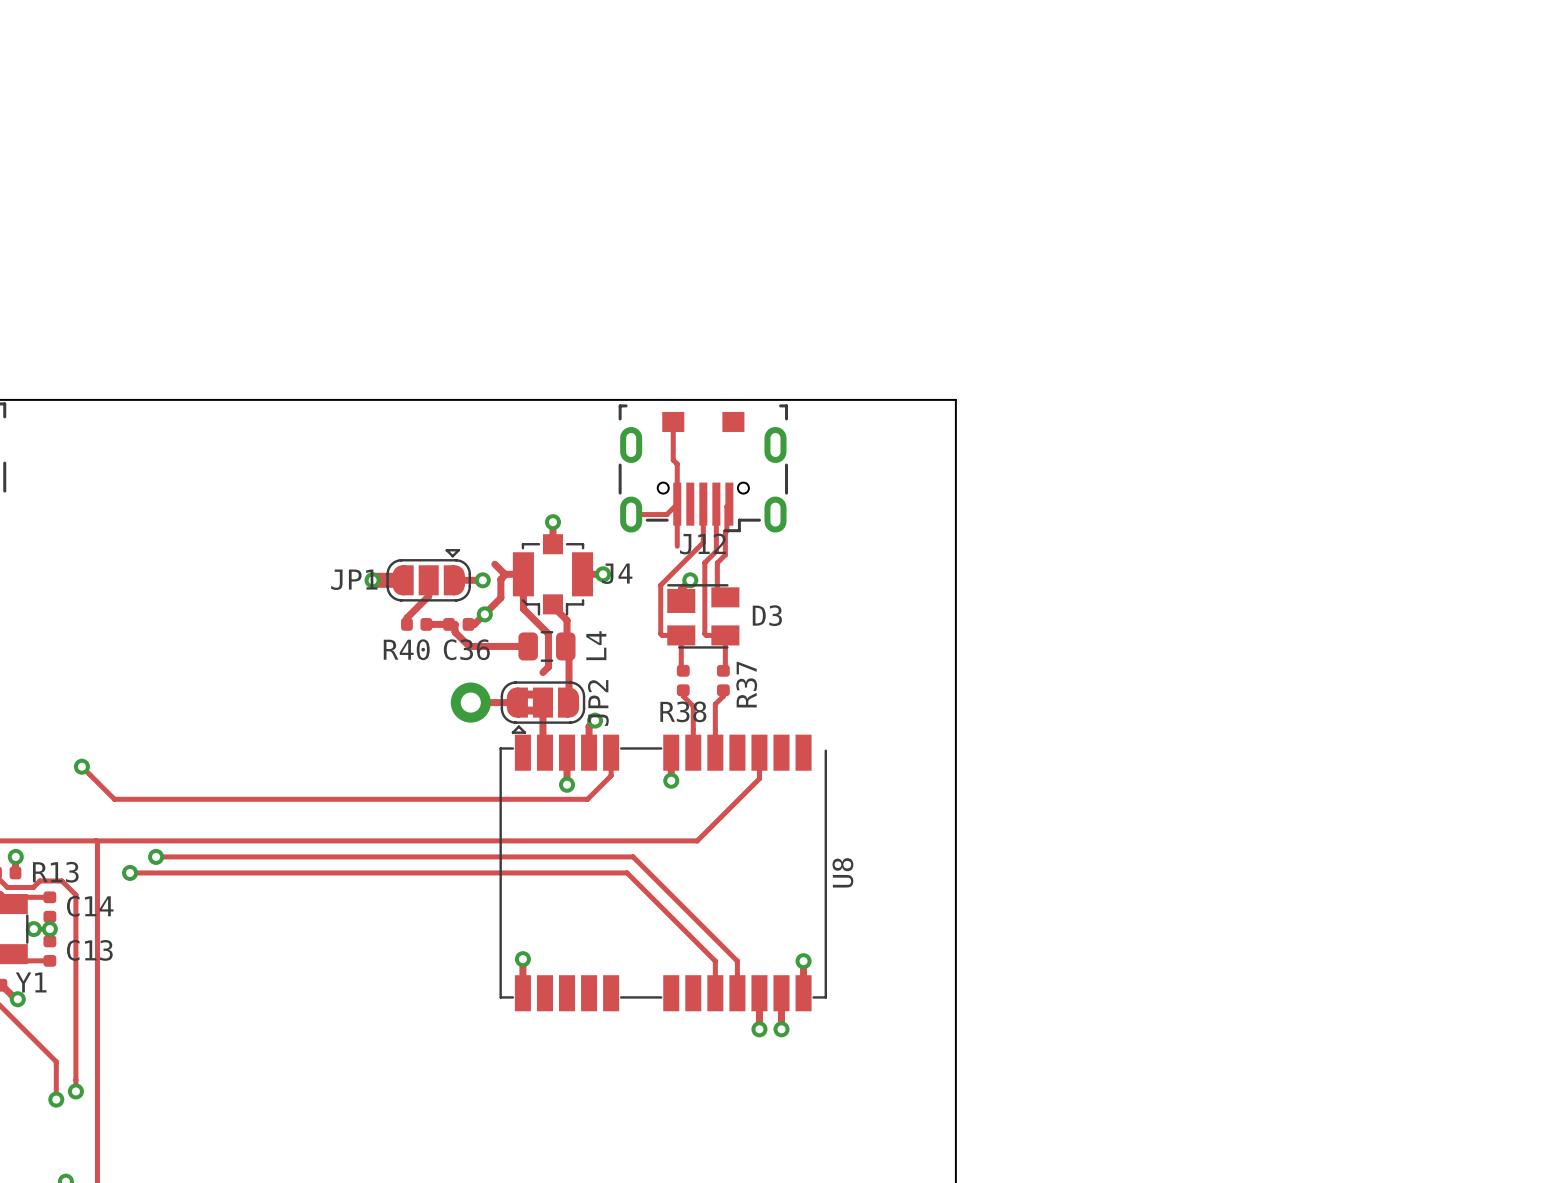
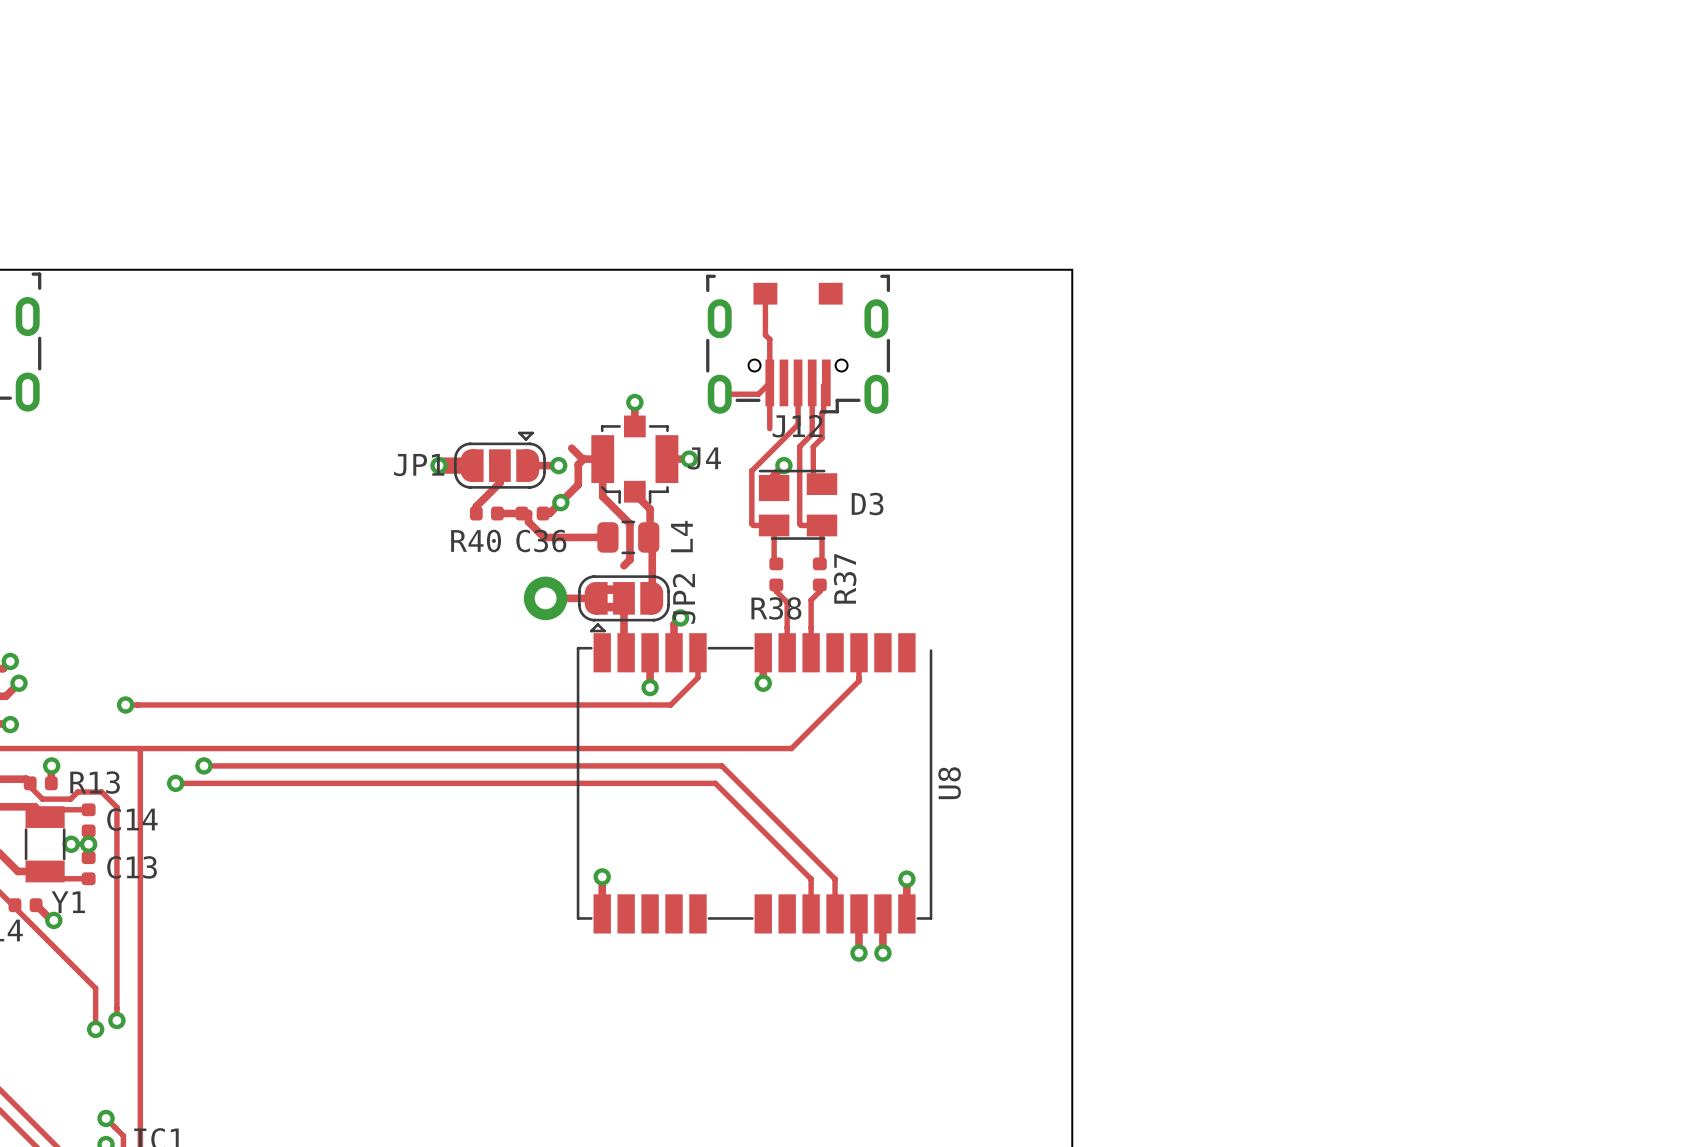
track: (81, 766) (114, 799) (587, 799) -> (125, 705) (670, 705) (672, 703)
via position: (81, 766) -> (125, 705)

